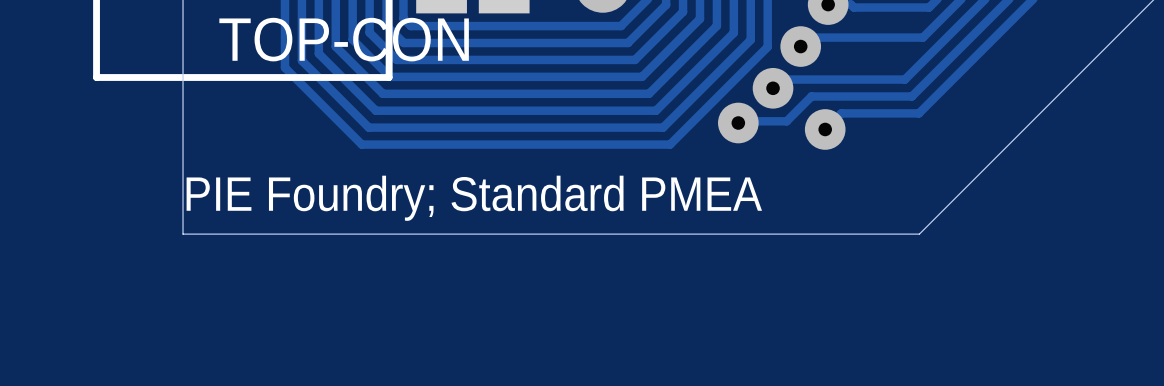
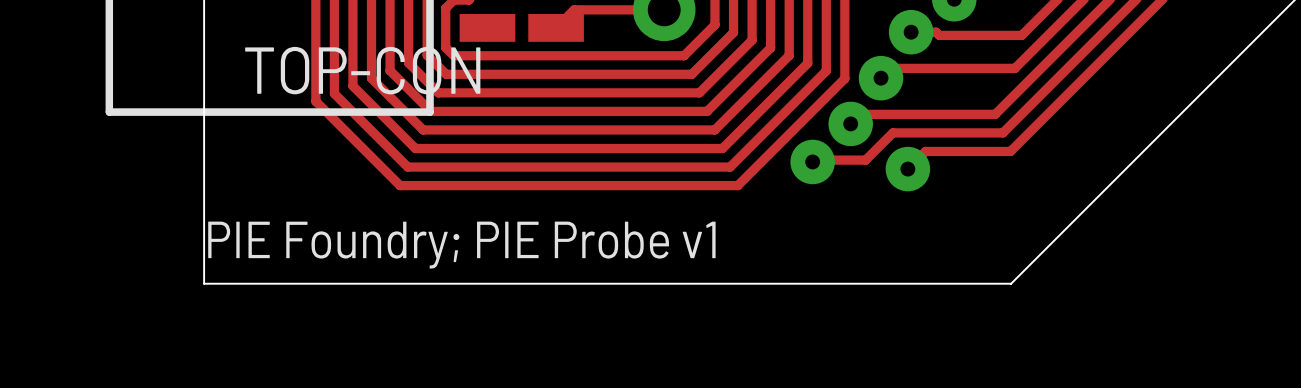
text: PIE Foundry; Standard PMEA (474, 198) -> PIE Foundry; PIE Probe v1 (461, 245)

